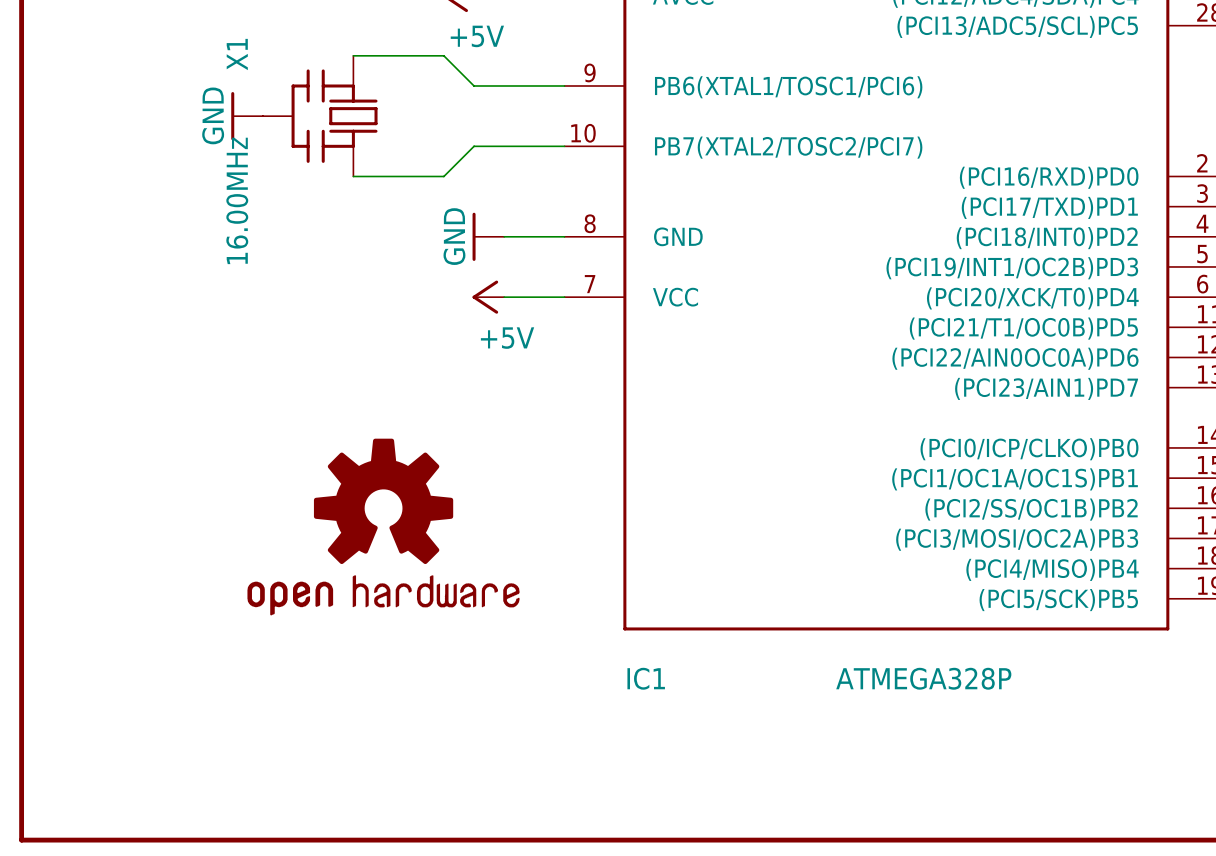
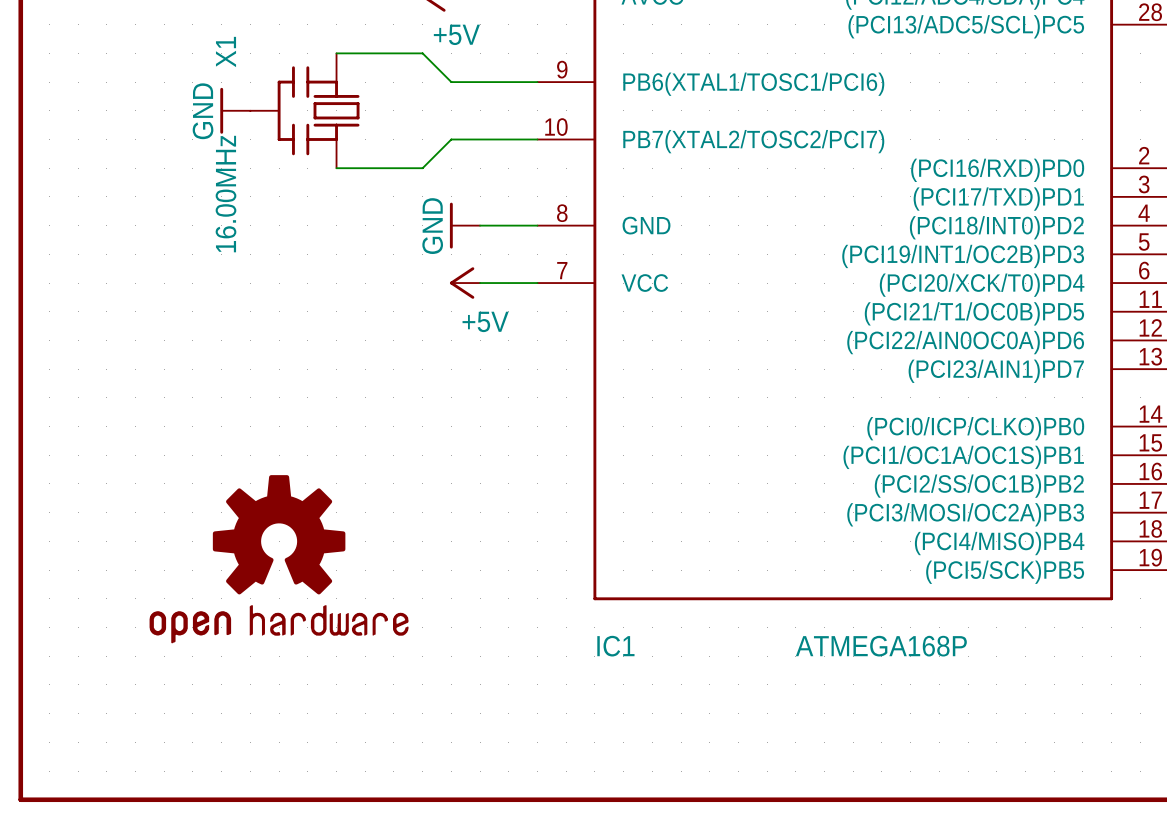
part position: (383, 526) -> (279, 559)
IC1 value: ATMEGA328P (923, 678) -> ATMEGA168P (881, 646)

